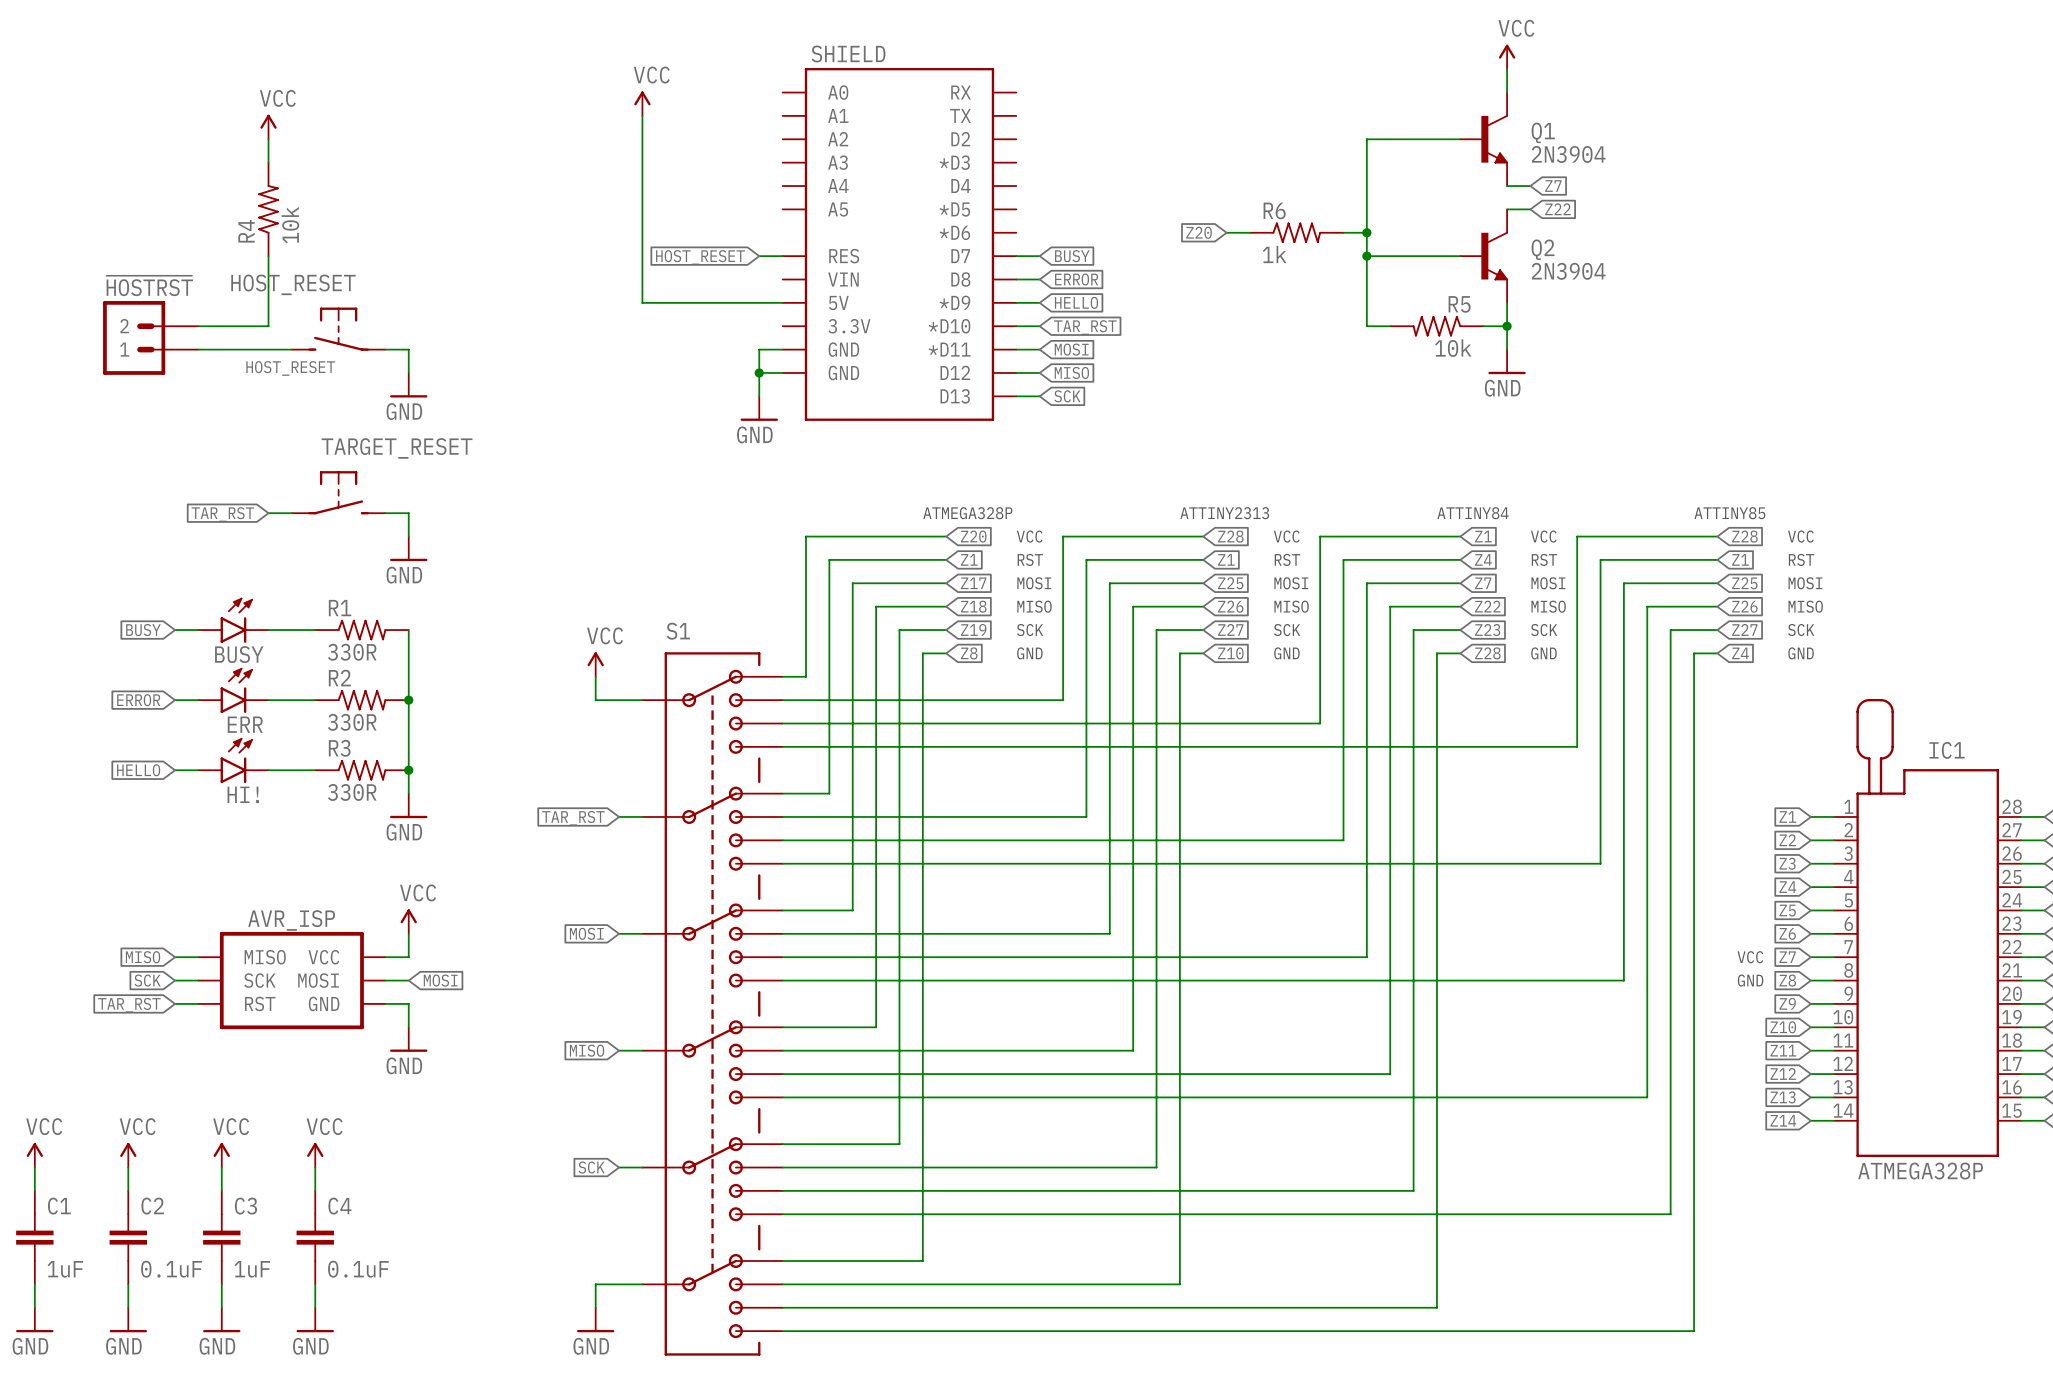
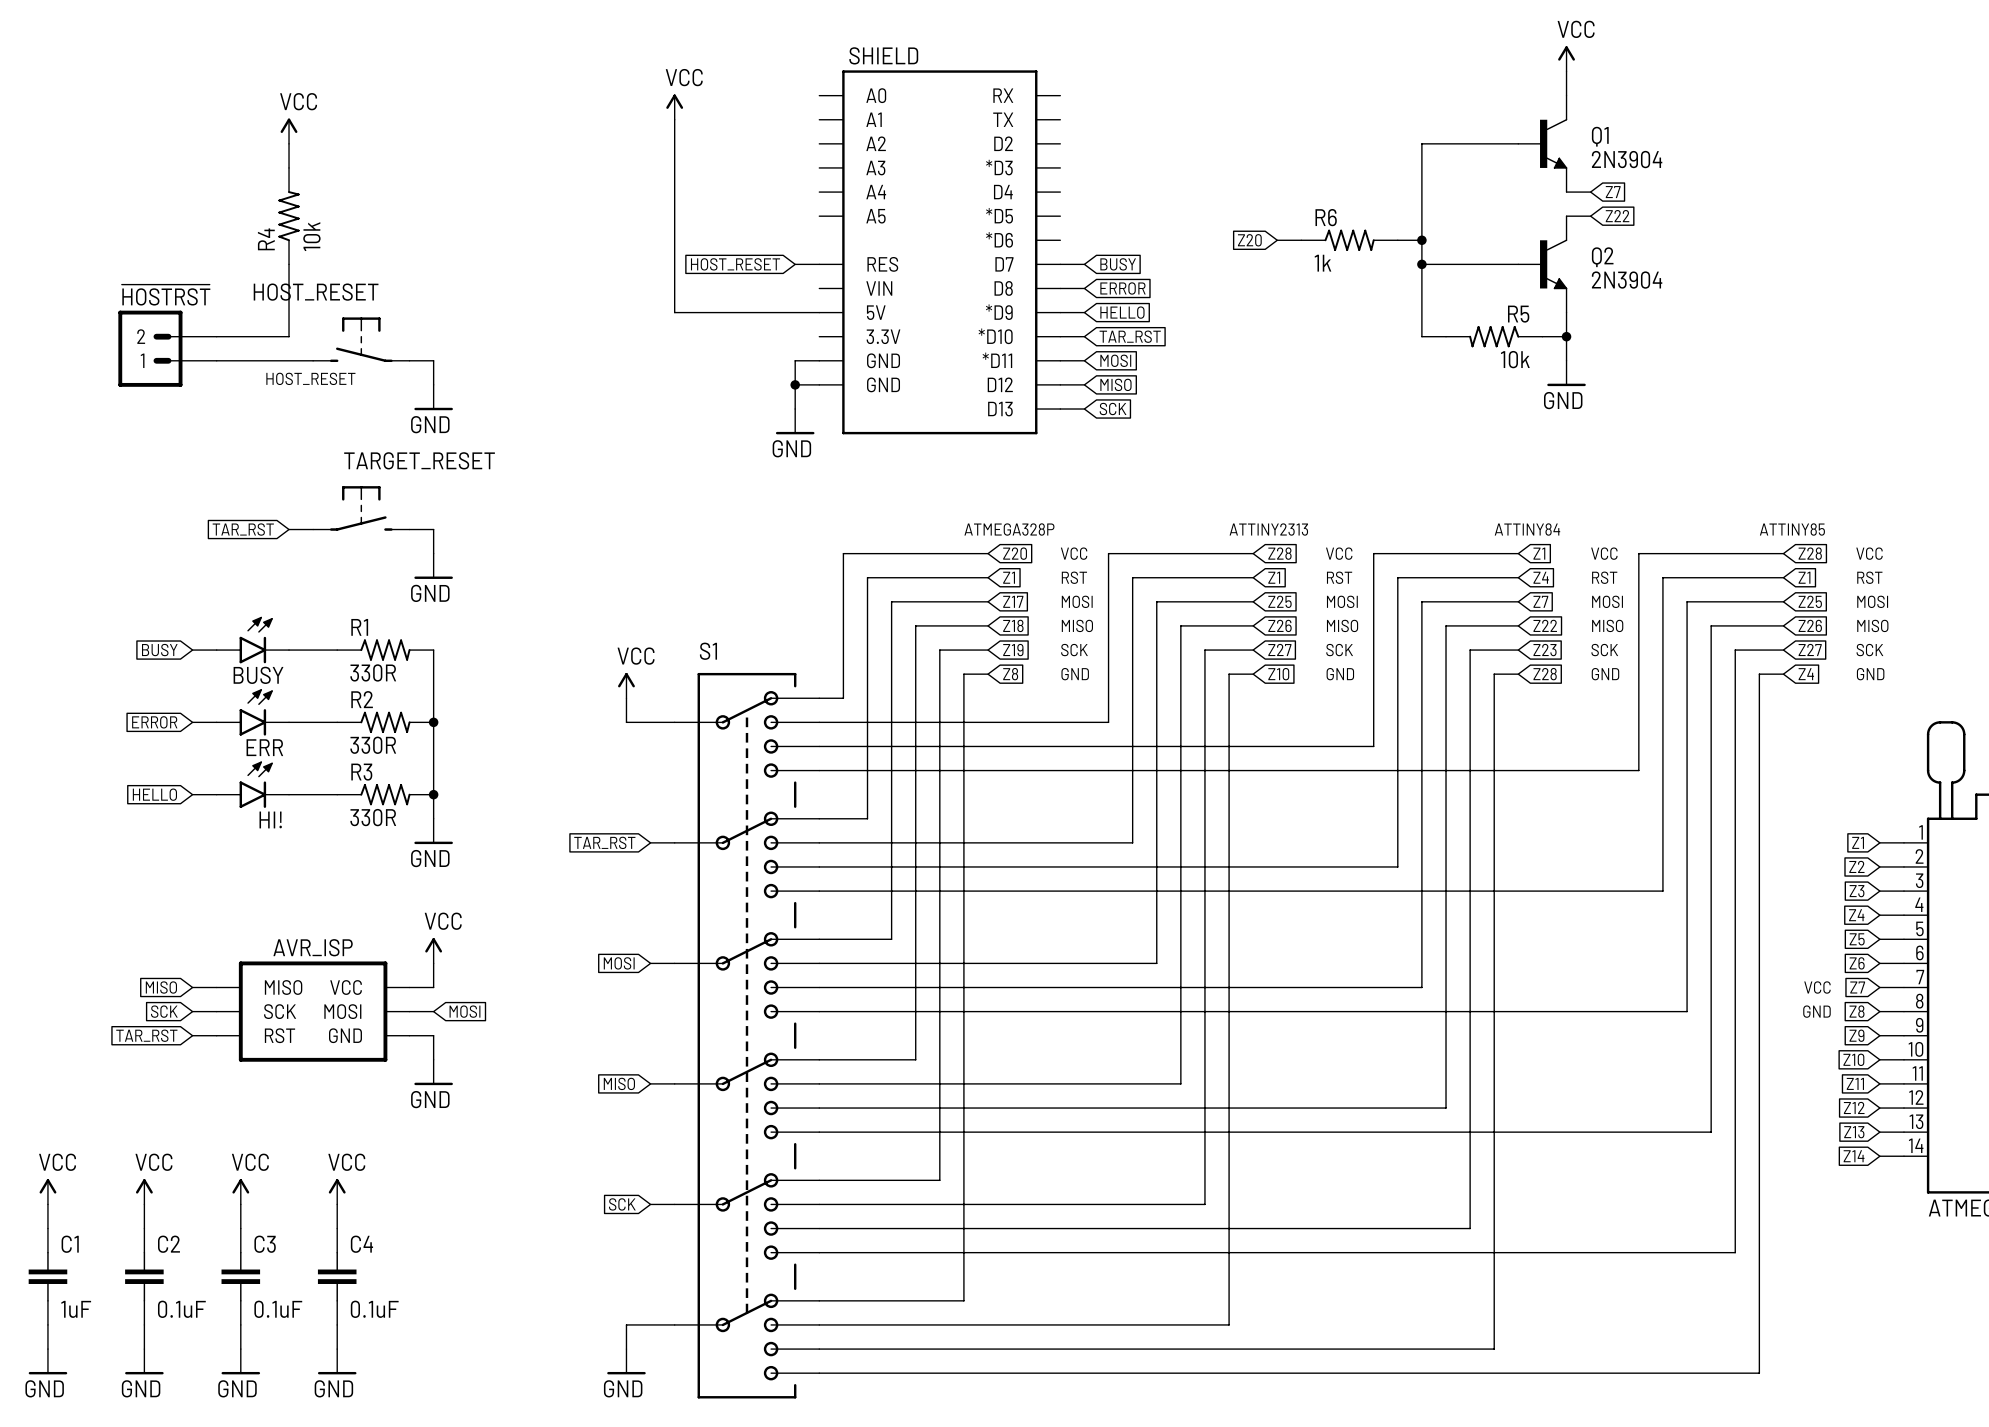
C3 value: 1uF (252, 1269) -> 0.1uF (278, 1309)

